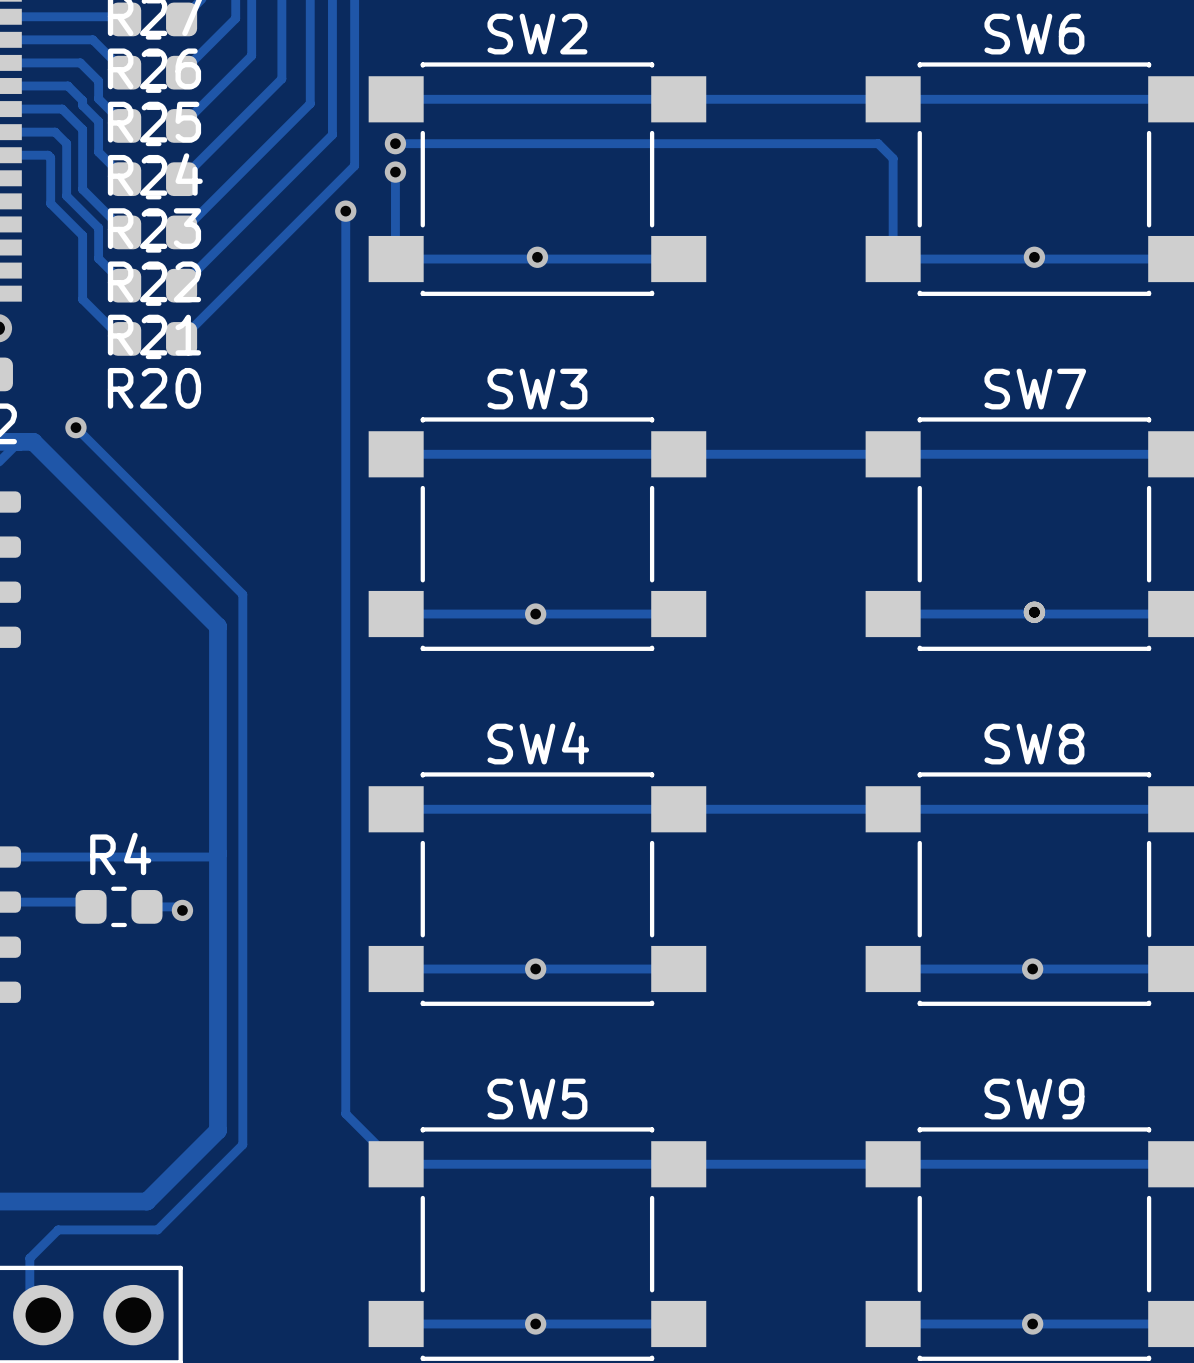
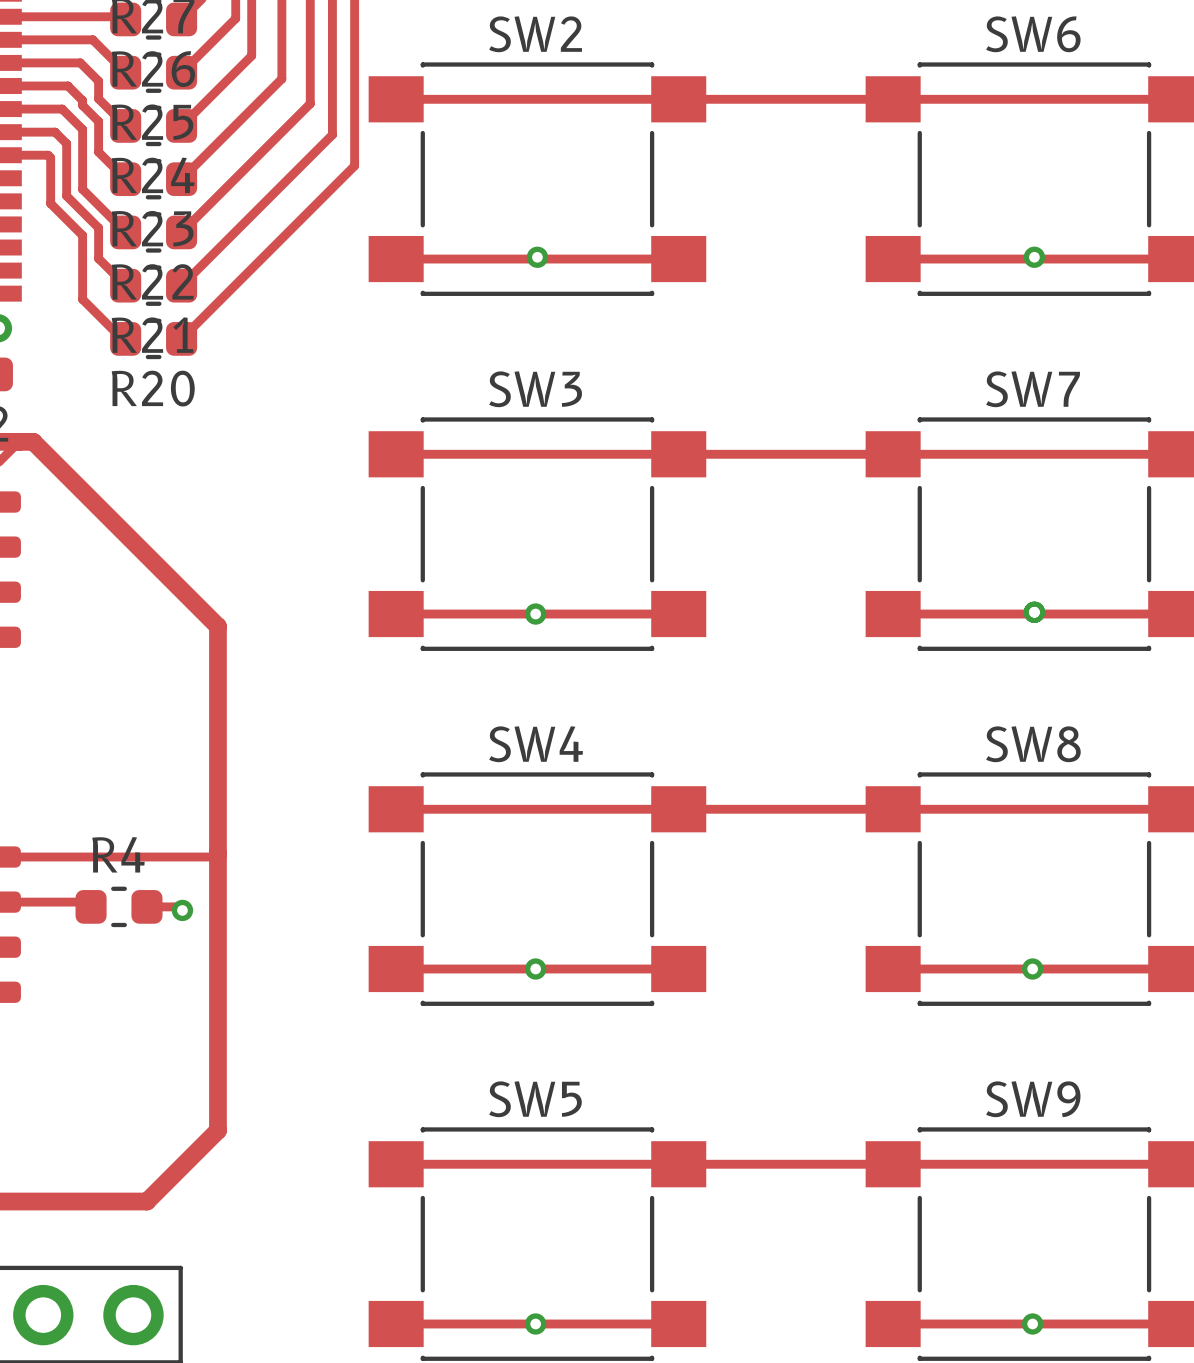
track: (395, 143) (878, 143) (893, 158) (893, 259) -> none
via: (395, 143) -> none
track: (395, 172) (396, 259) -> none
via: (395, 172) -> none
track: (345, 211) (345, 1113) (396, 1164) -> none
via: (345, 211) -> none
track: (75, 427) (242, 594) (242, 1144) (157, 1229) (58, 1229) (29, 1258) (29, 1301) (43, 1315) -> none
via: (75, 427) -> none

